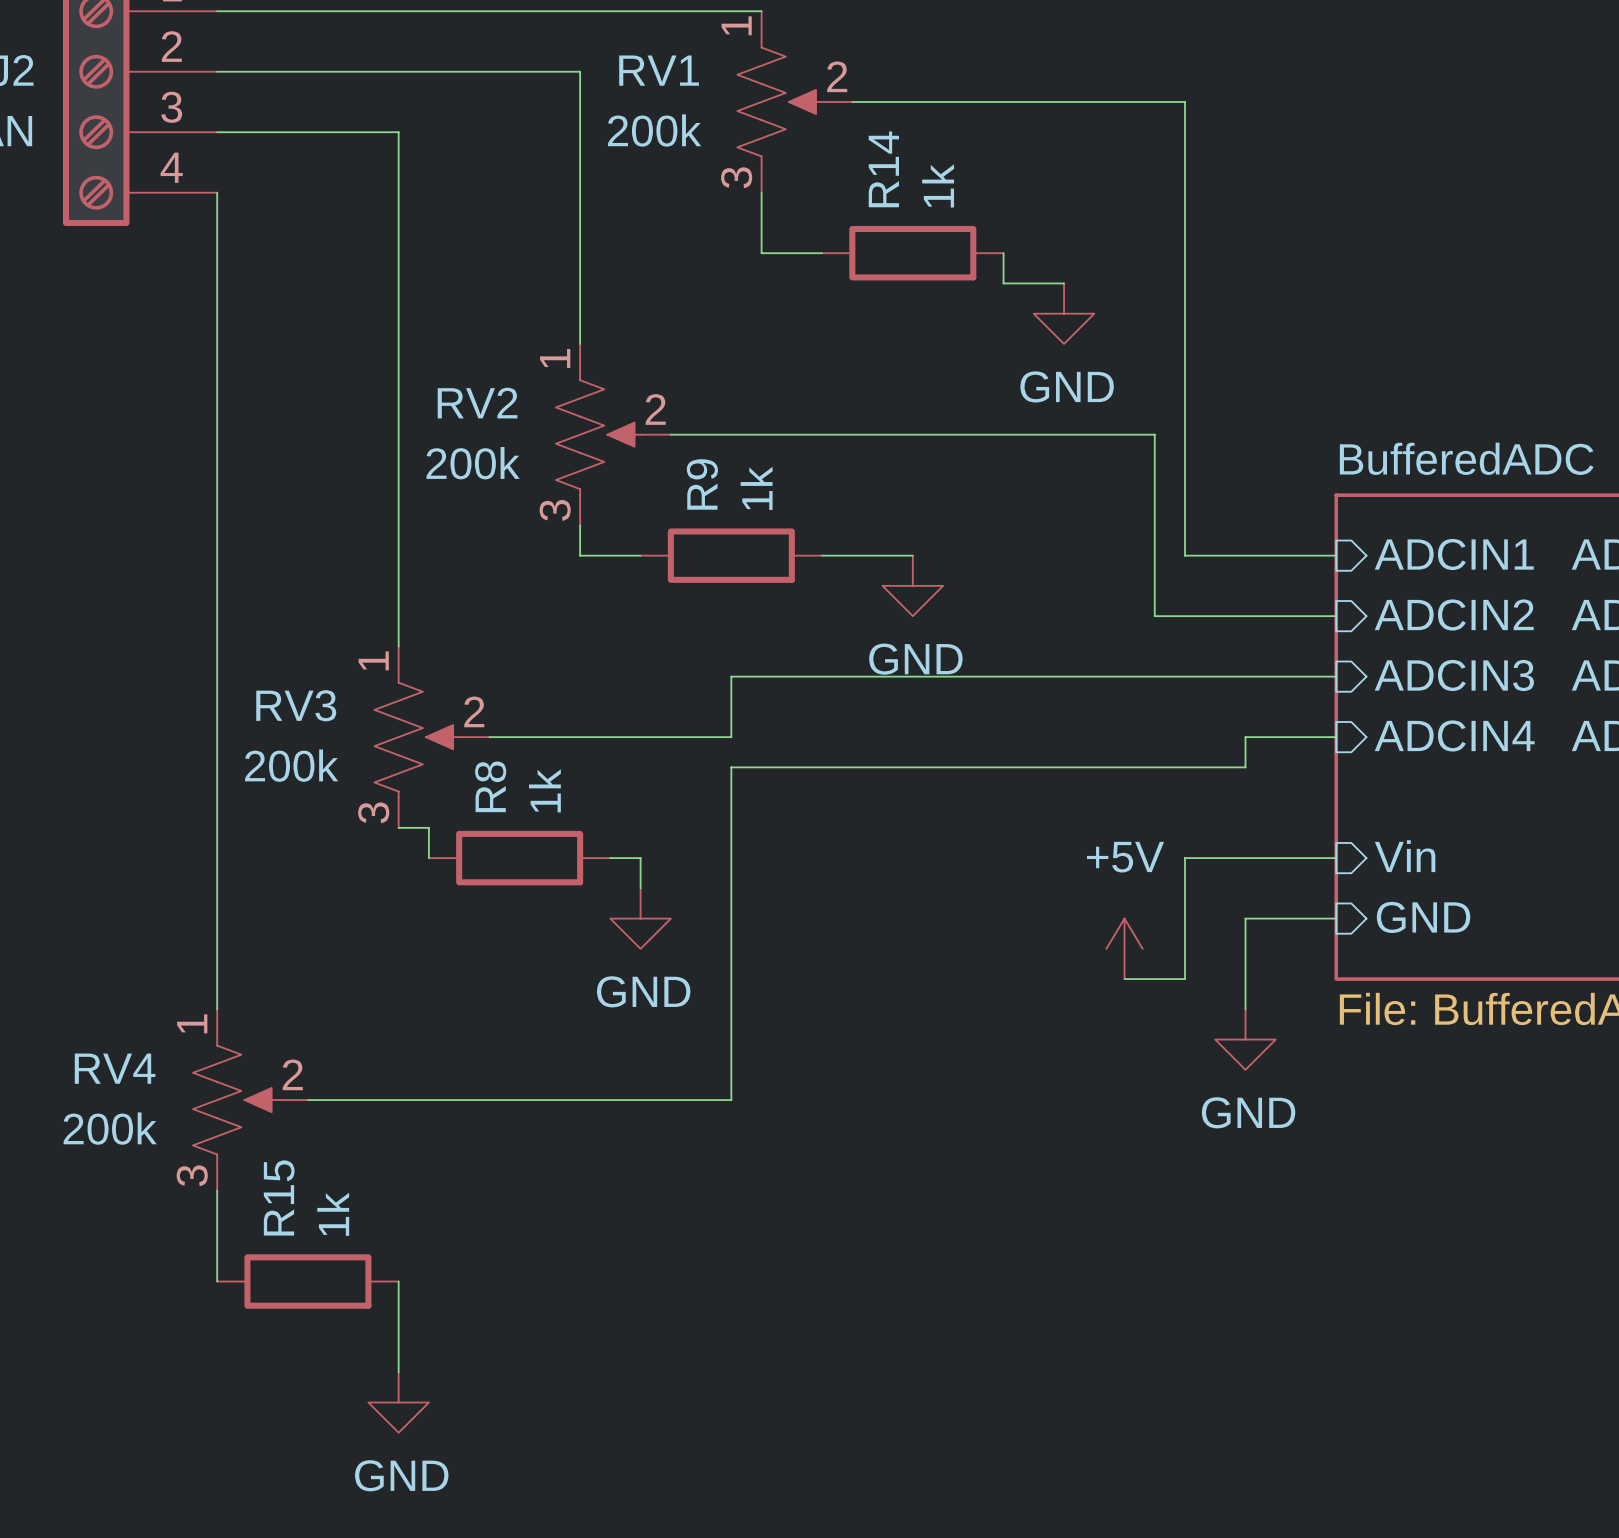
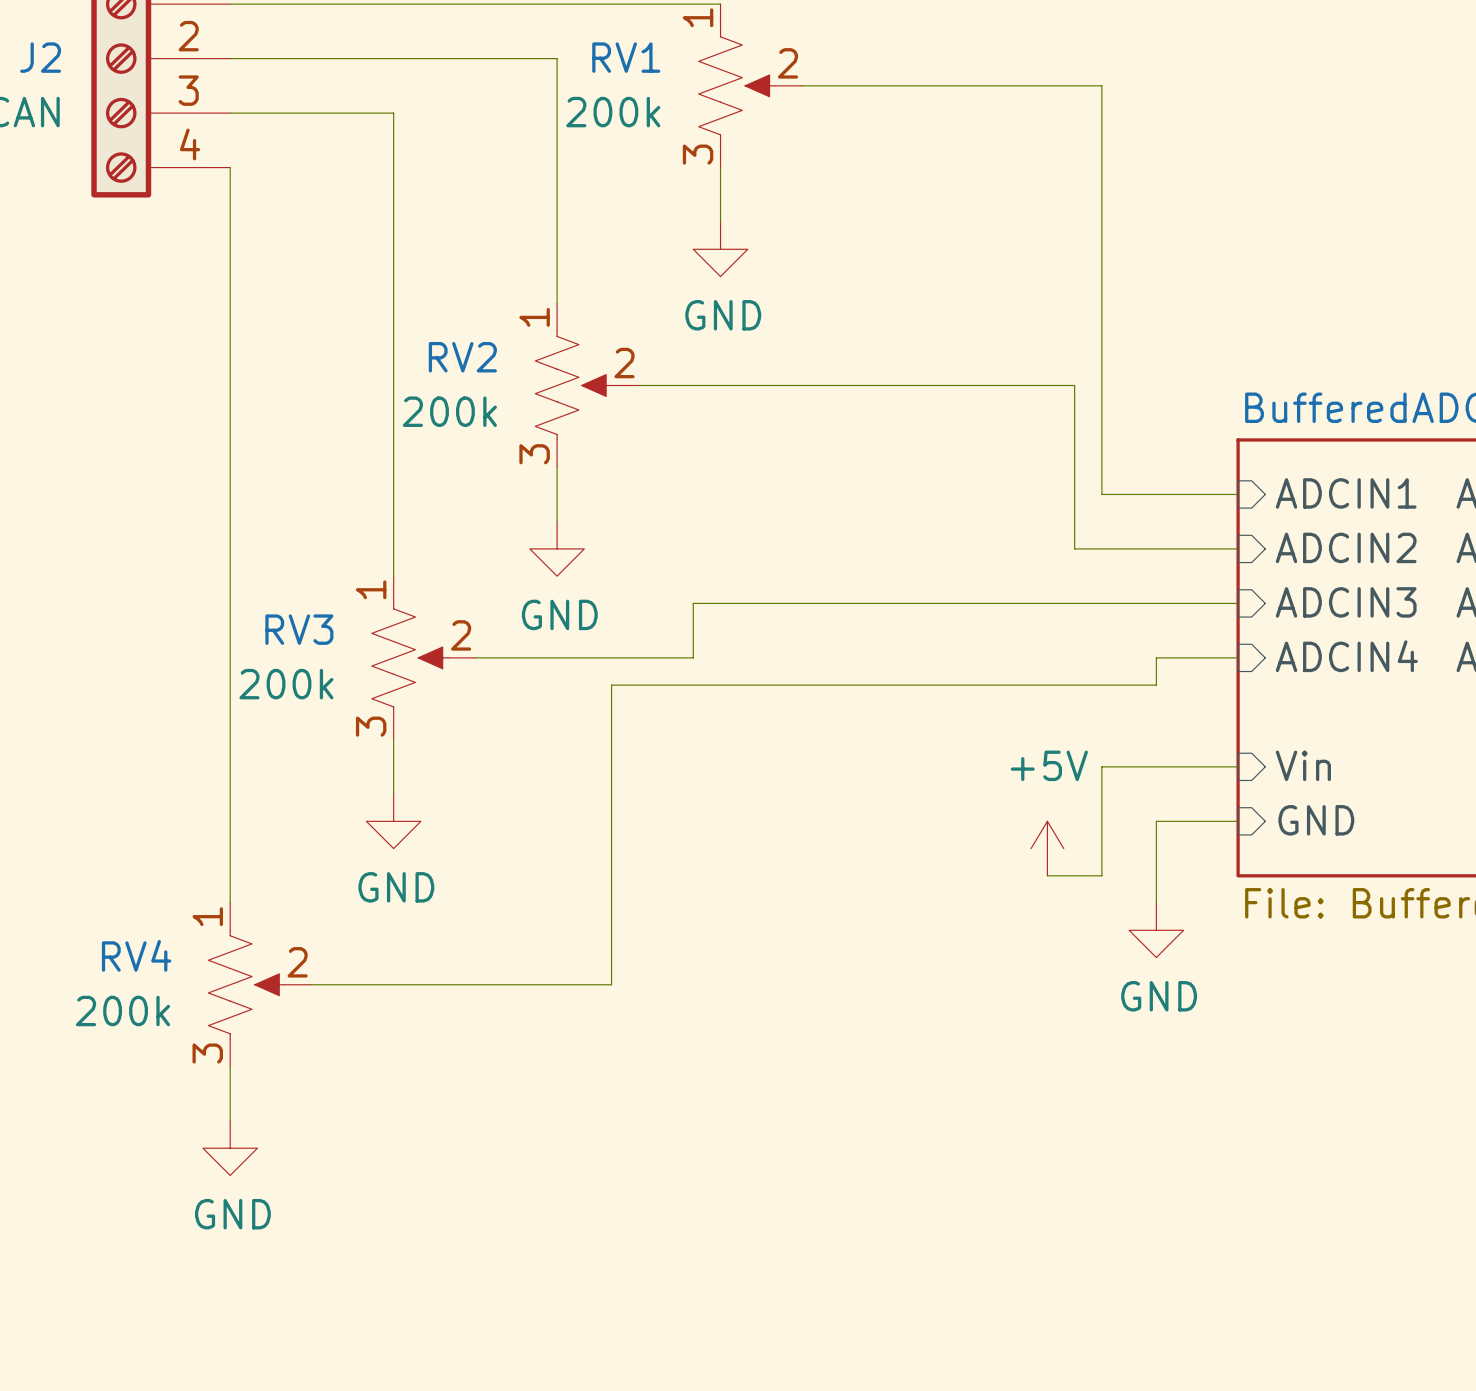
wire: (761, 253) (822, 253) -> none
R14: 1k (912, 253) -> none
wire: (1003, 253) (1003, 283) (1064, 283) -> none
power symbol: none -> GND (720, 249)
power symbol: GND (1064, 313) -> none
wire: (580, 555) (640, 555) -> (557, 494) (557, 521)
R9: 1k (731, 555) -> none
wire: (822, 555) (912, 555) -> none
power symbol: GND (912, 585) -> none
power symbol: none -> GND (557, 548)
wire: (731, 767) (731, 1100) (640, 1100) -> (611, 794) (611, 984)
wire: (398, 827) (428, 827) (428, 858) -> (393, 739) (393, 794)
R8: 1k (519, 858) -> none
wire: (610, 858) (640, 858) -> (693, 685) (611, 685) (611, 766)
power symbol: none -> GND (393, 821)
power symbol: GND (640, 918) -> none
R15: 1k (307, 1281) -> none
wire: (398, 1281) (398, 1372) -> none
power symbol position: GND (398, 1402) -> GND (230, 1148)

